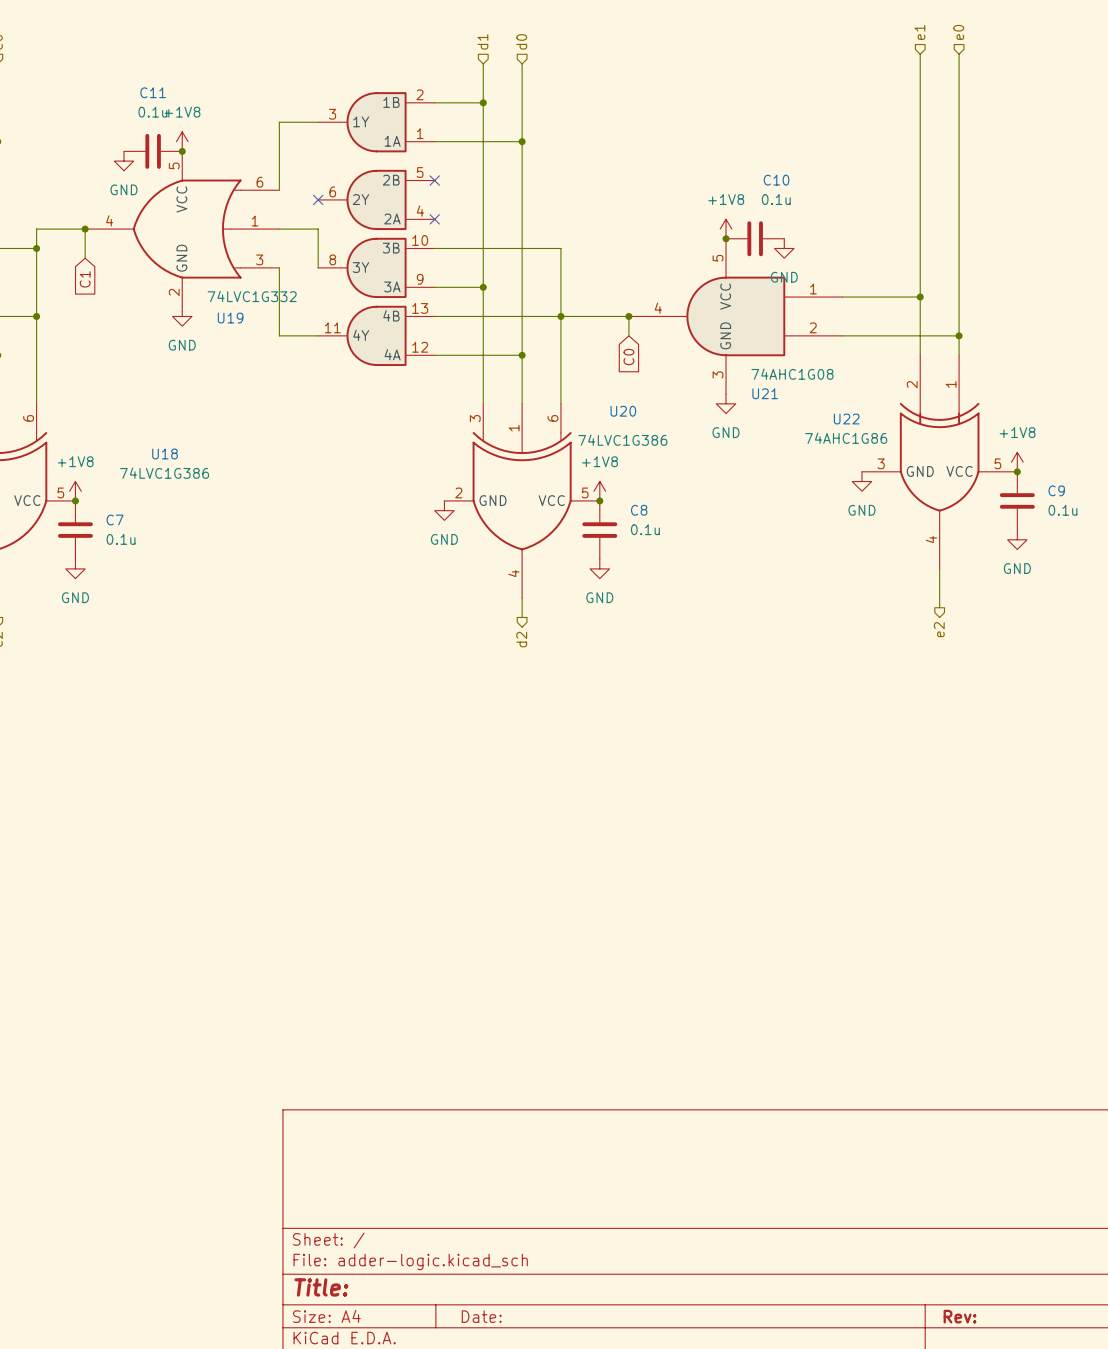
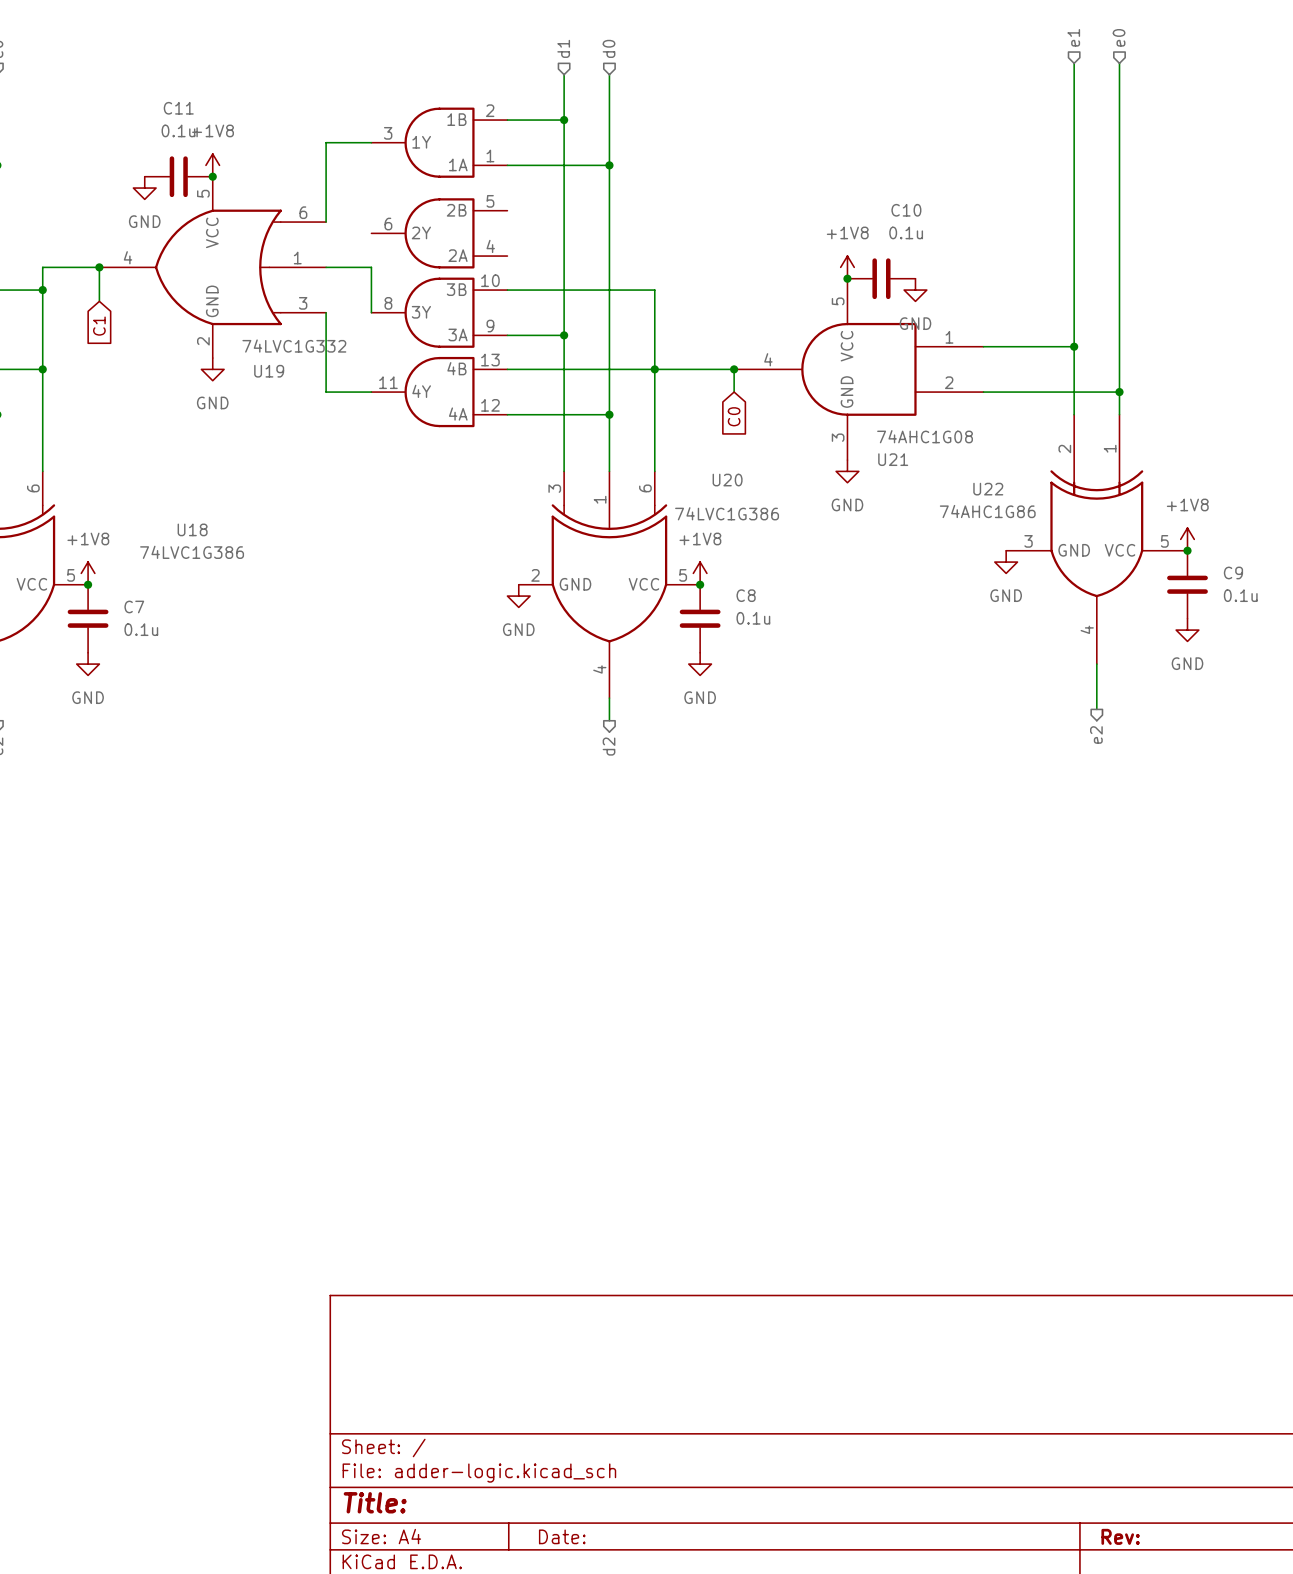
no-connect mark: (434, 180) -> none
no-connect mark: (318, 199) -> none
no-connect mark: (434, 219) -> none

